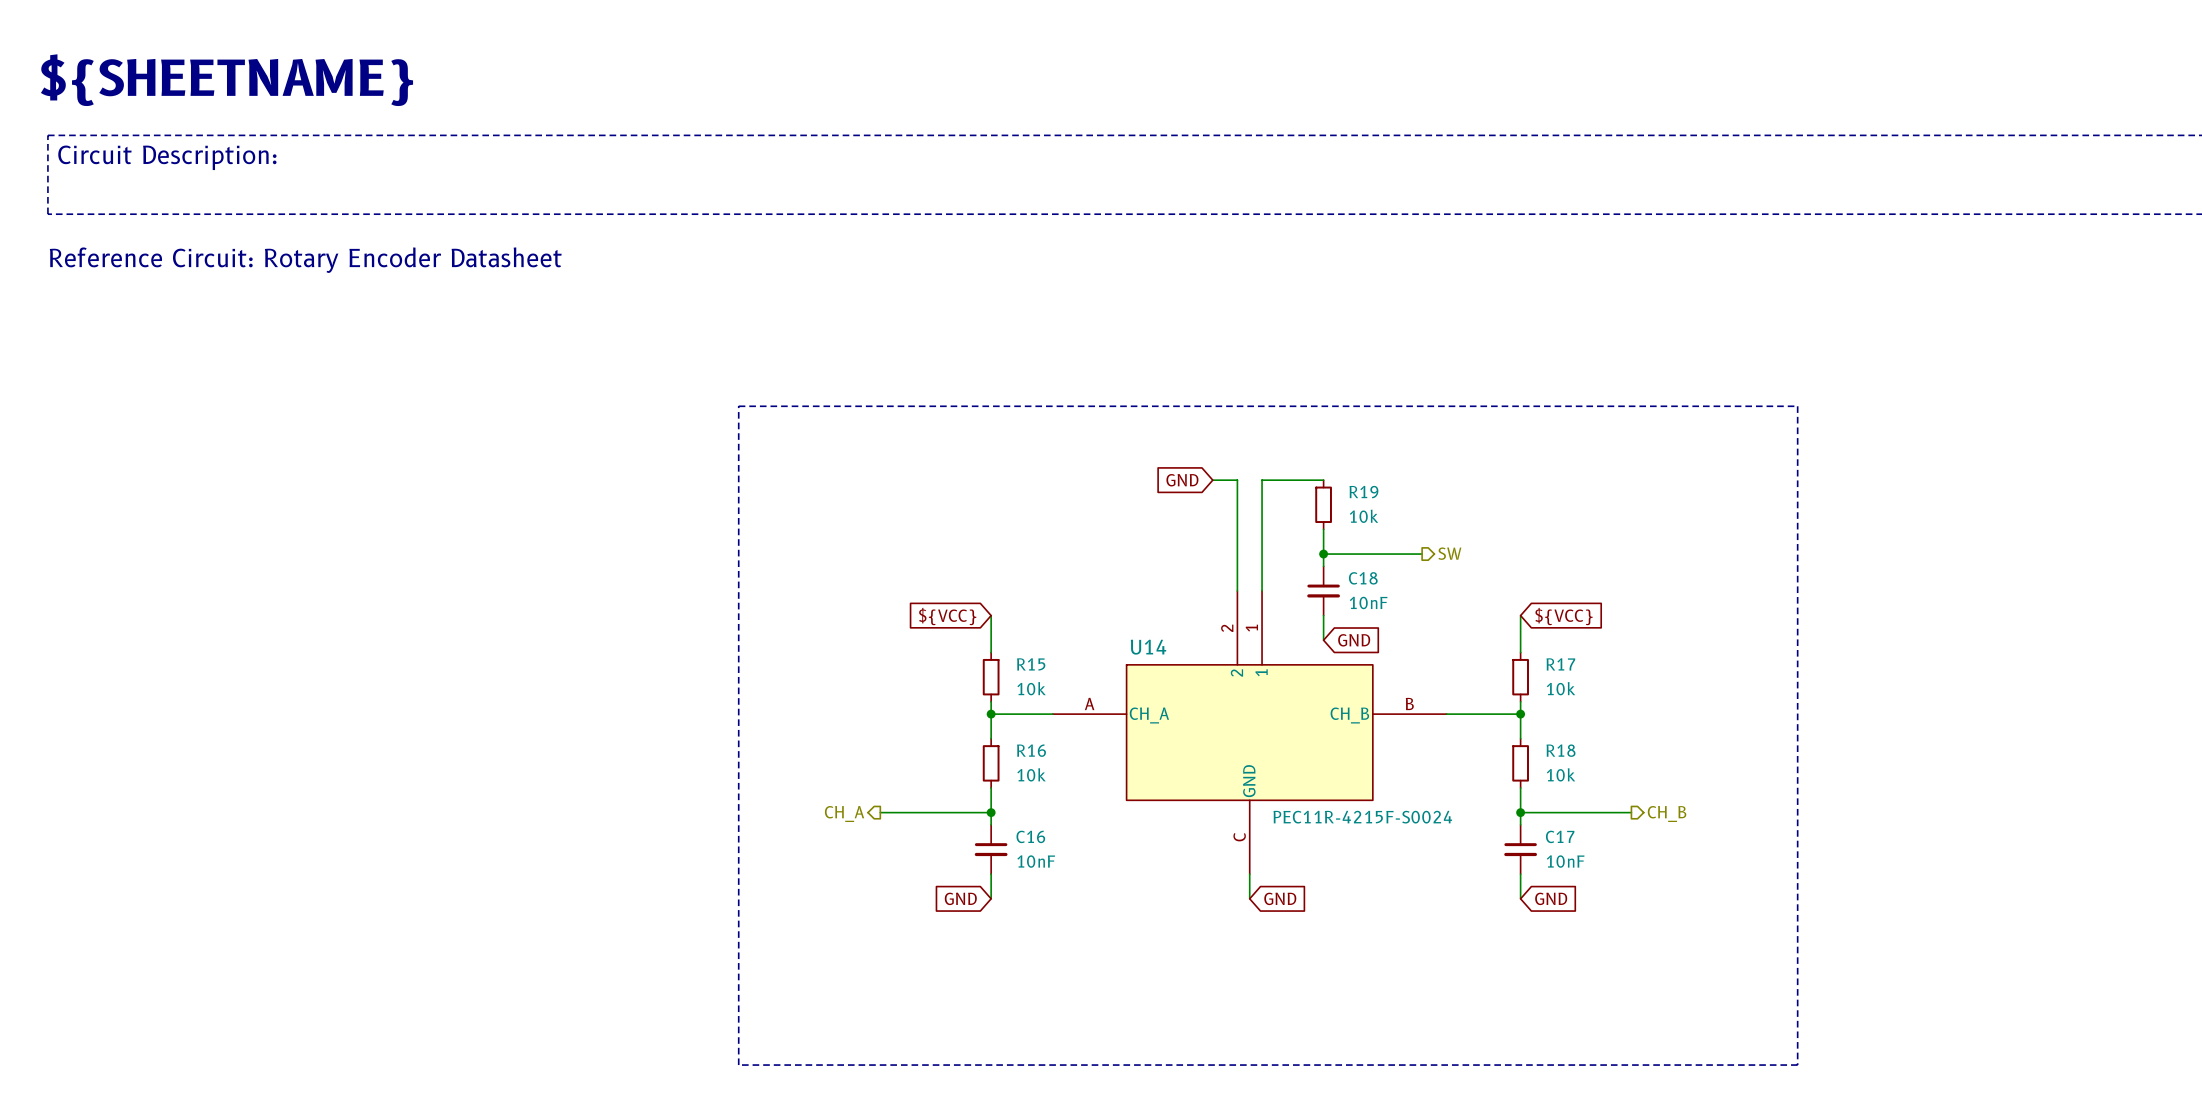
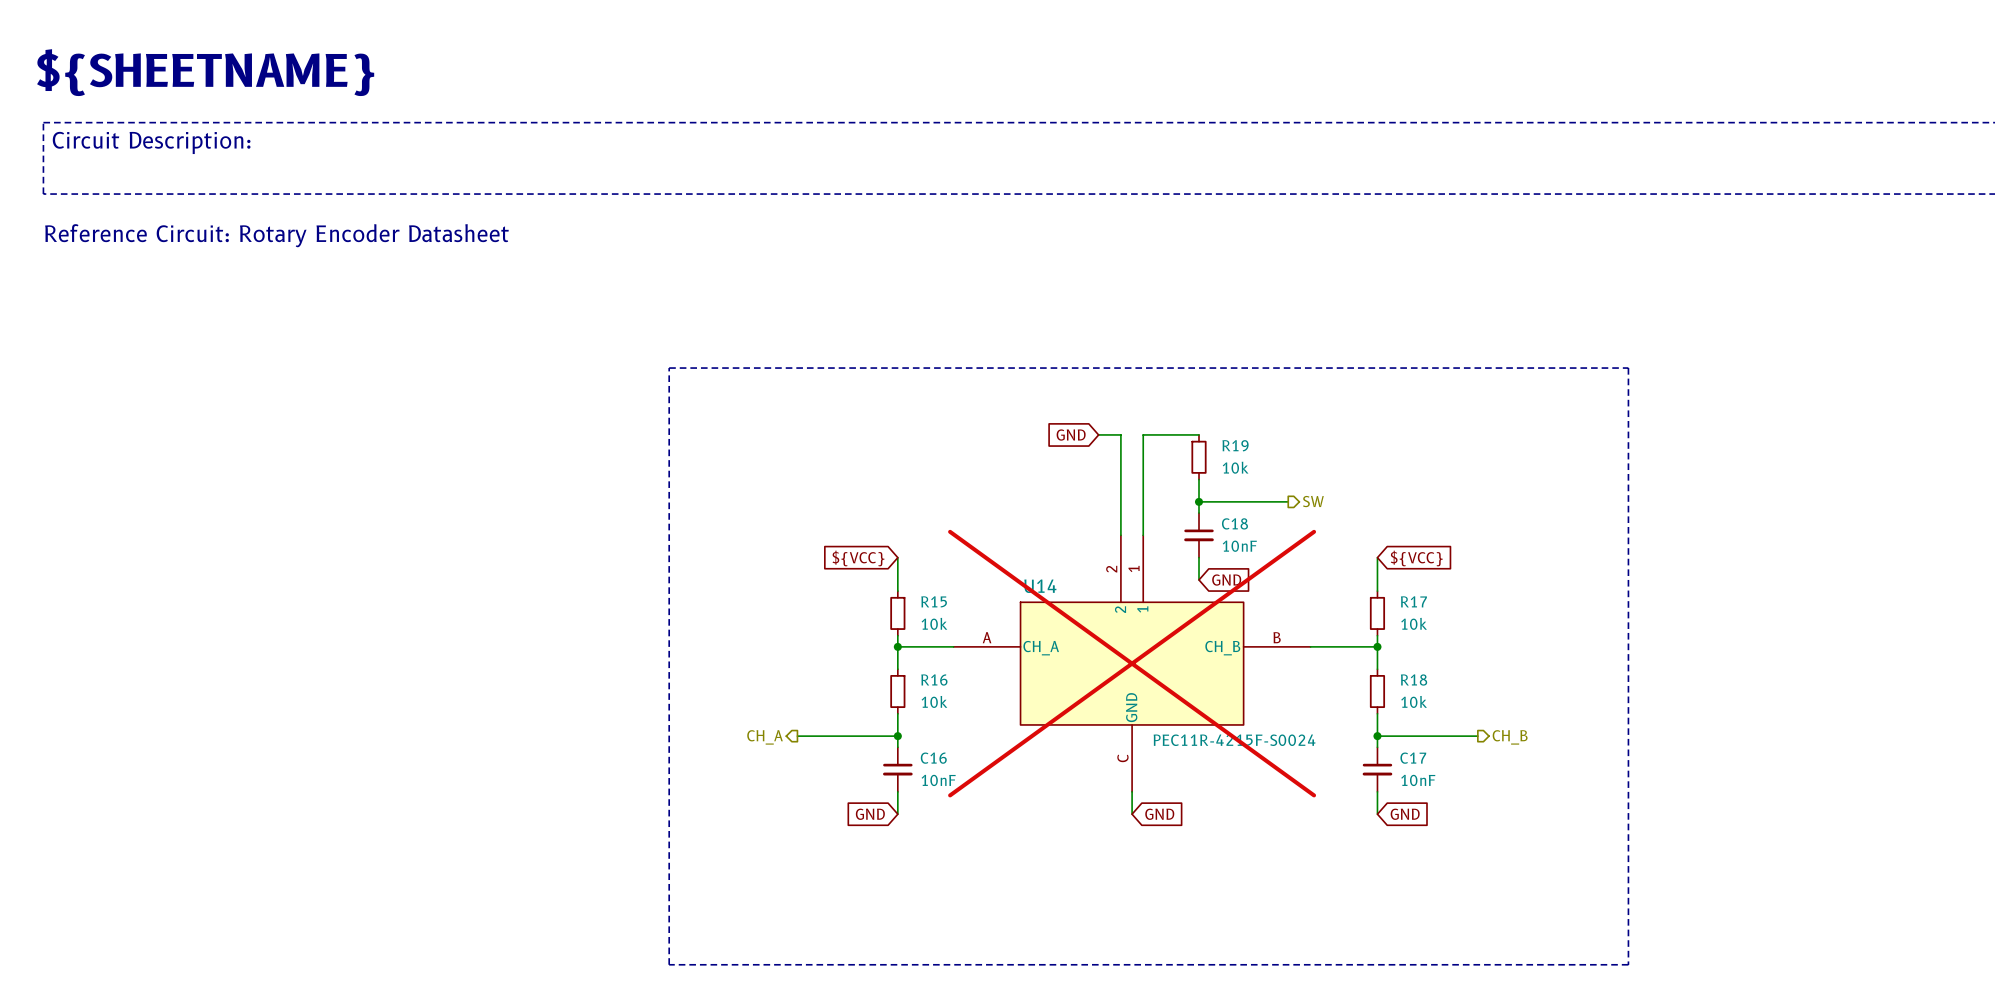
U14 do-not-place cross: none -> (1132, 663)

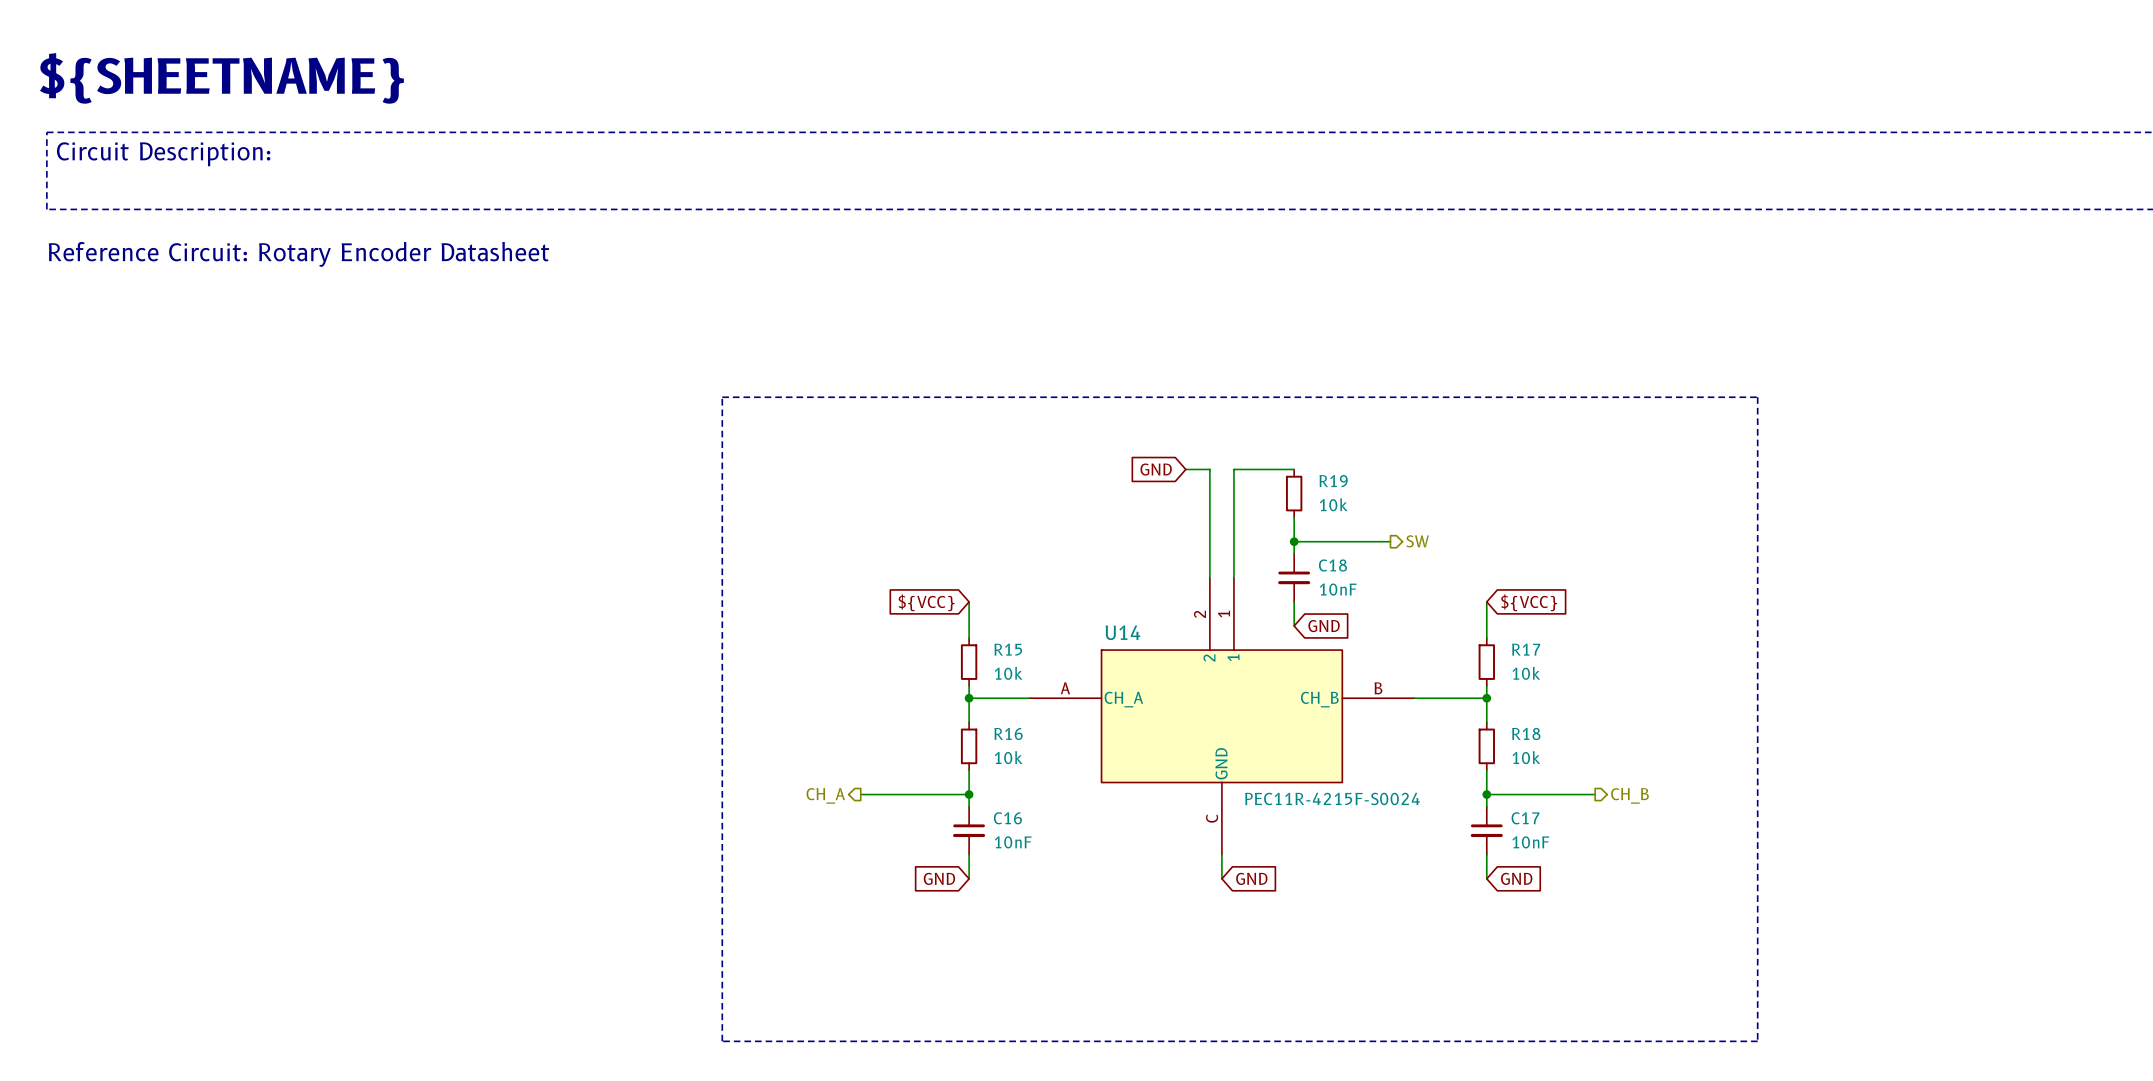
U14 do-not-place cross: (1132, 663) -> none

